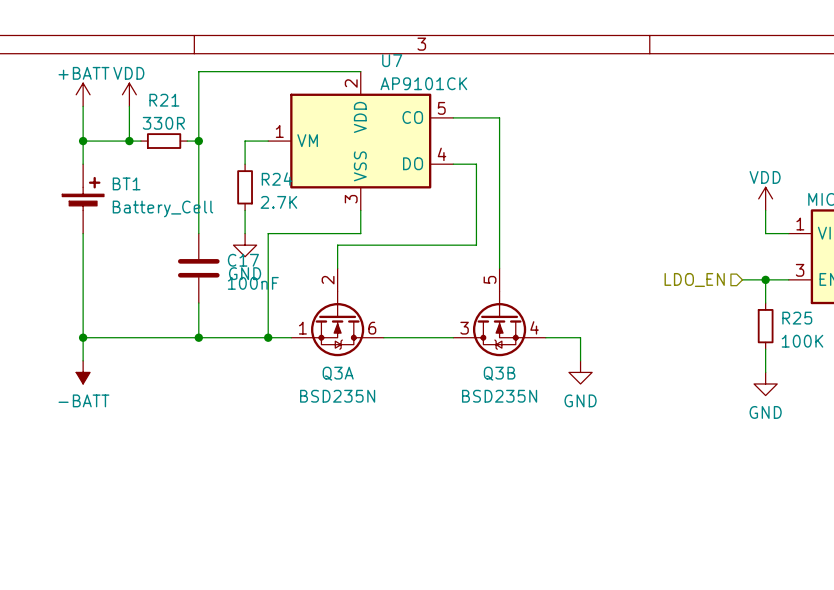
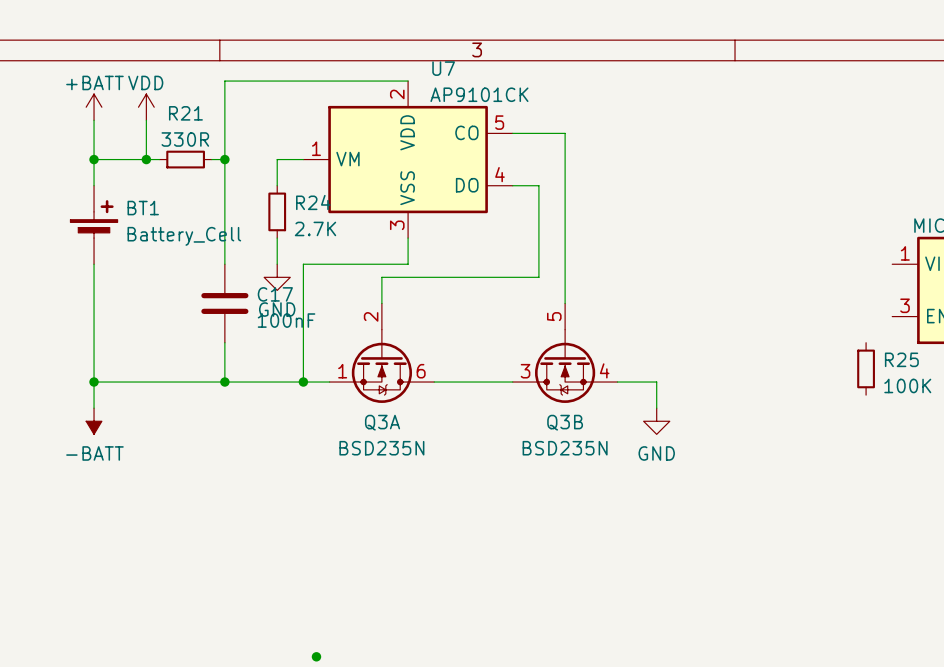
power symbol: VDD (765, 198) -> none
wire: (765, 210) (765, 233) (788, 233) -> none
hierarchical label: LDO_EN (694, 279) -> none
wire: (742, 279) (788, 279) -> none
wire: (765, 279) (765, 303) -> none
junction: (765, 279) -> none
wire: (765, 349) (765, 372) -> none
power symbol: GND (765, 383) -> none
junction: none -> (316, 656)

